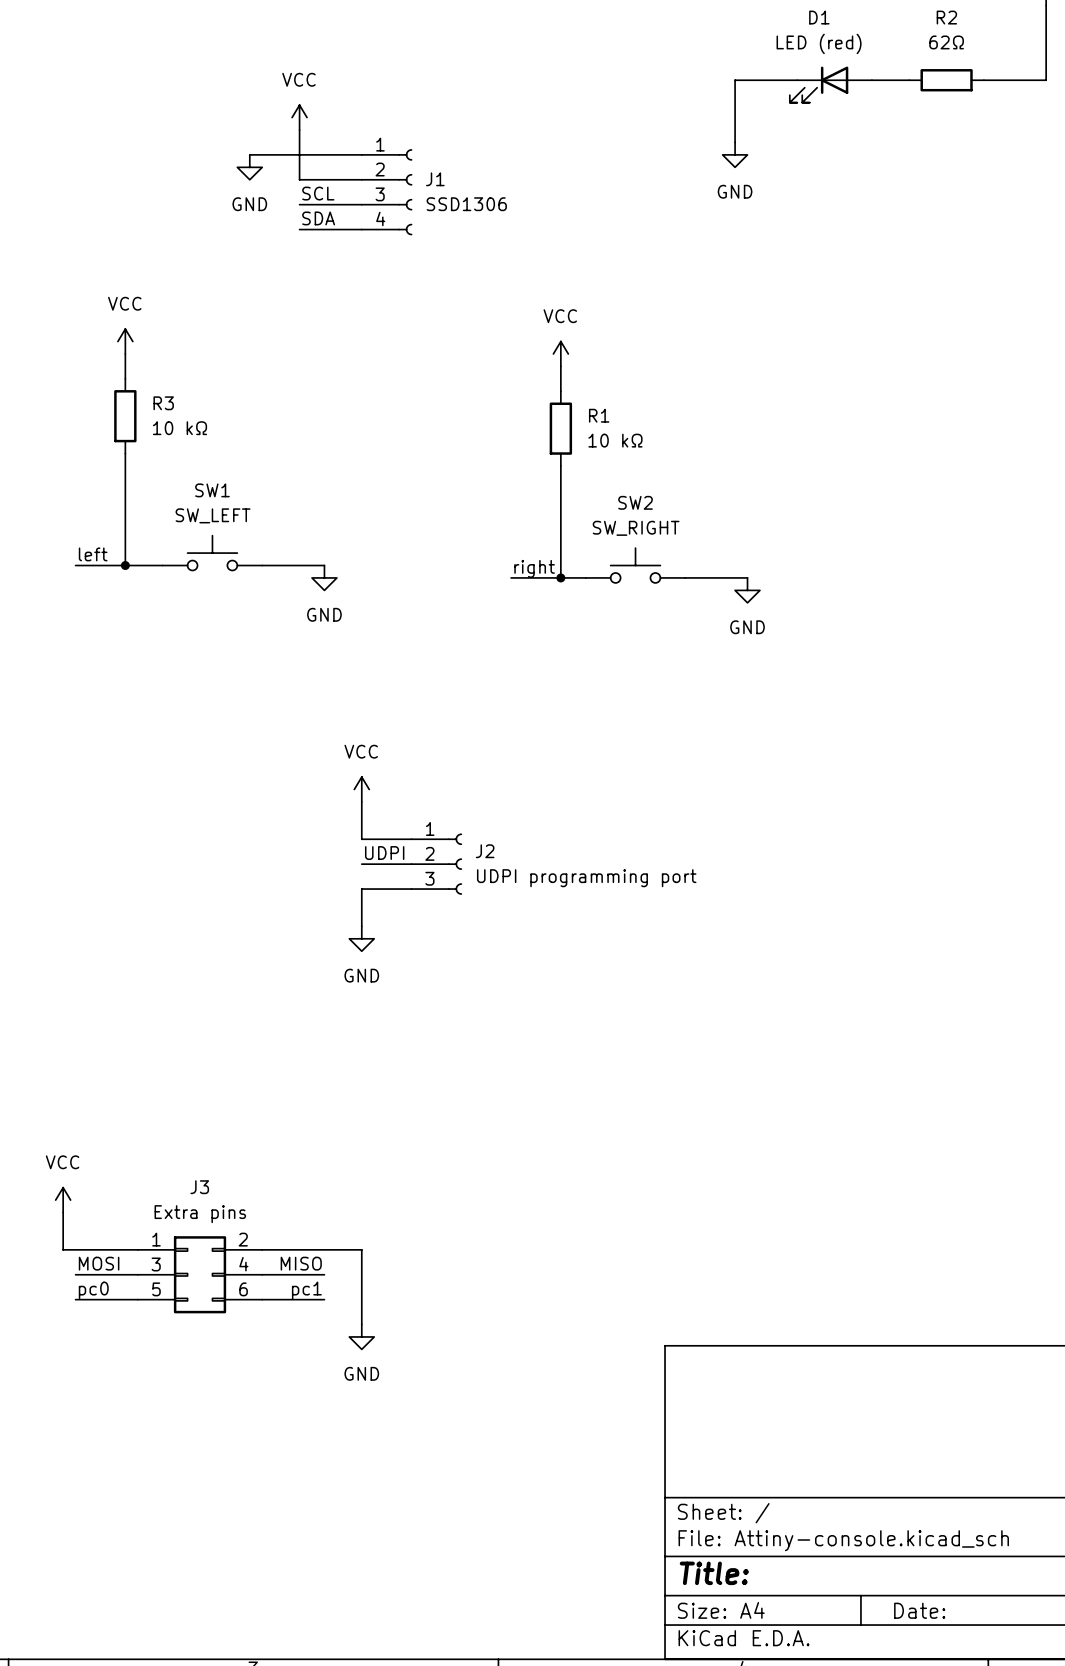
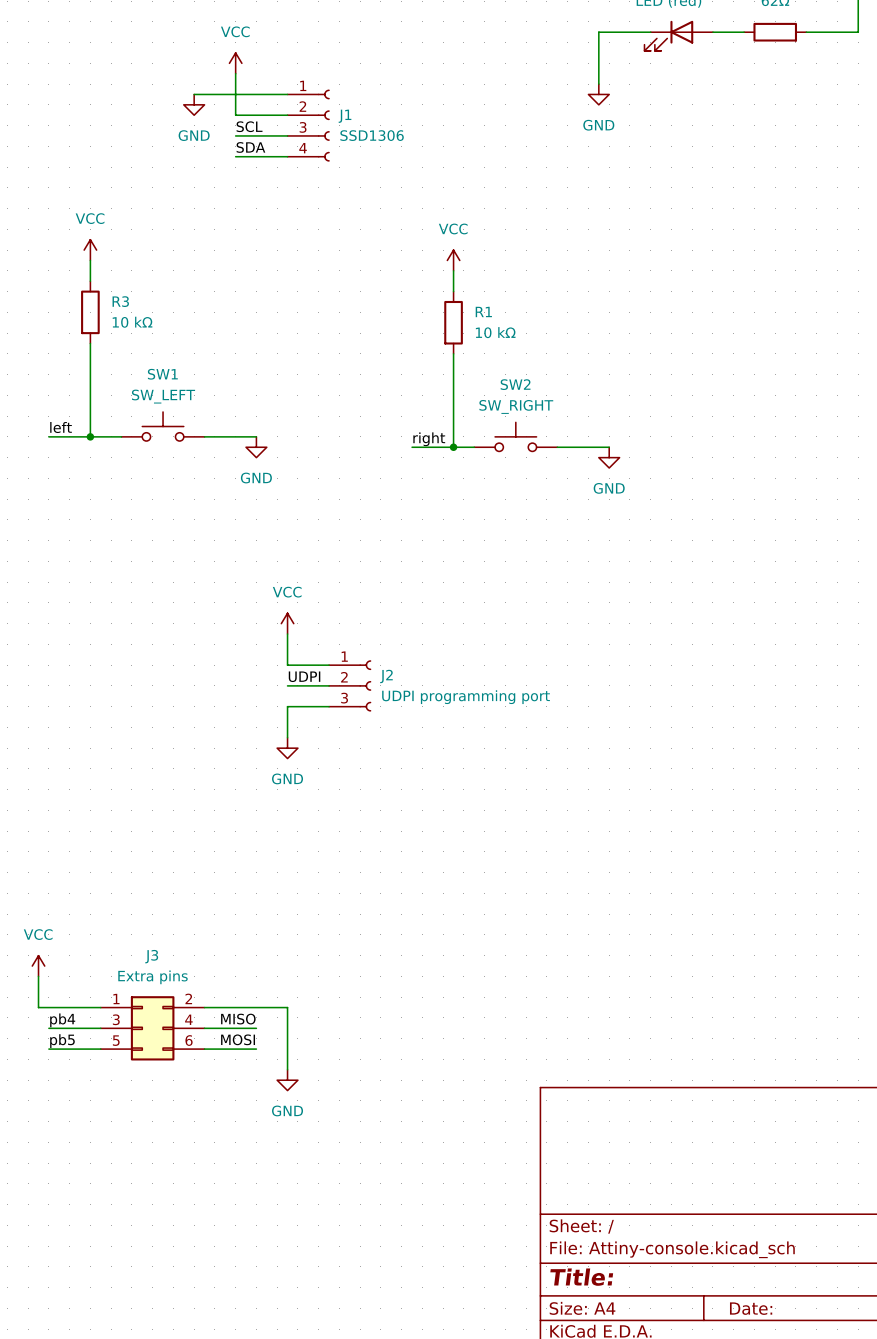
label: MOSI (99, 1263) -> pb4 (62, 1020)
label: pc0 (93, 1290) -> pb5 (62, 1041)
label: pc1 (306, 1290) -> MOSI (238, 1039)

